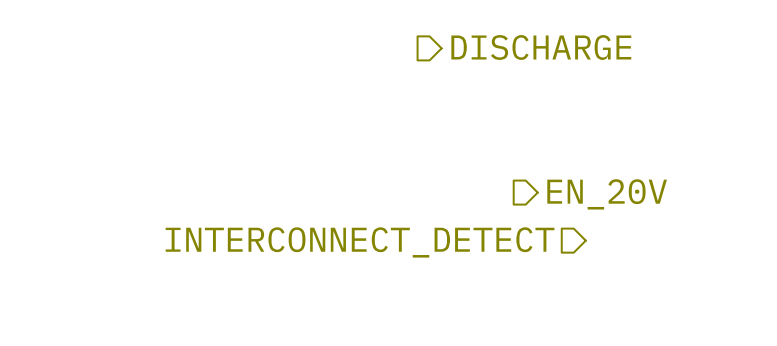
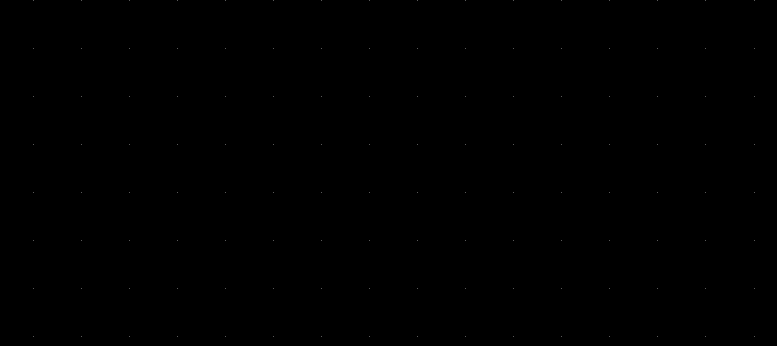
hierarchical label: DISCHARGE (541, 47) -> none
hierarchical label: EN_20V (607, 194) -> none
hierarchical label: INTERCONNECT_DETECT (360, 242) -> none

